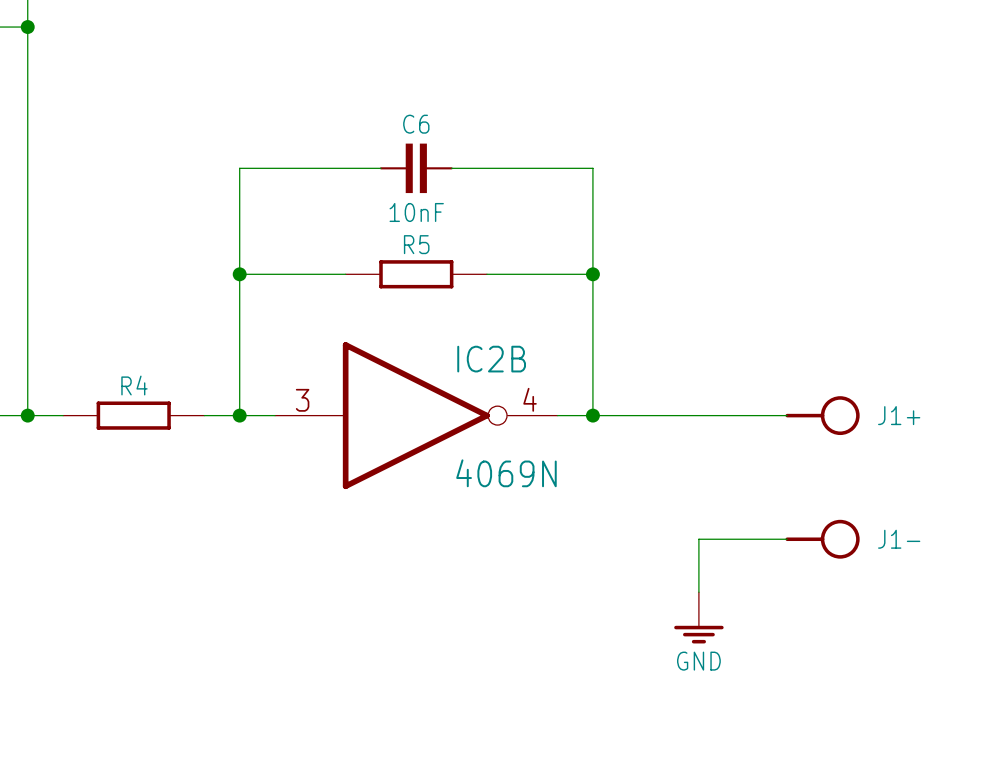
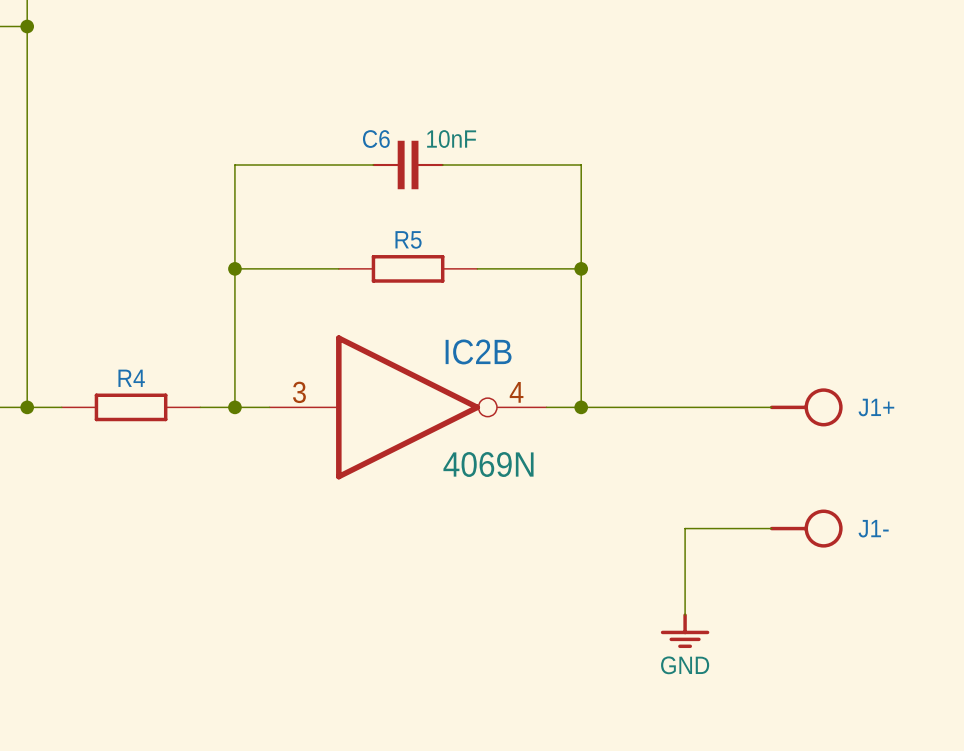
C6 name position: C6 (416, 124) -> C6 (376, 139)
C6 value position: 10nF (416, 212) -> 10nF (451, 139)
power symbol: GND (698, 617) -> none
power symbol: none -> GND (685, 630)

